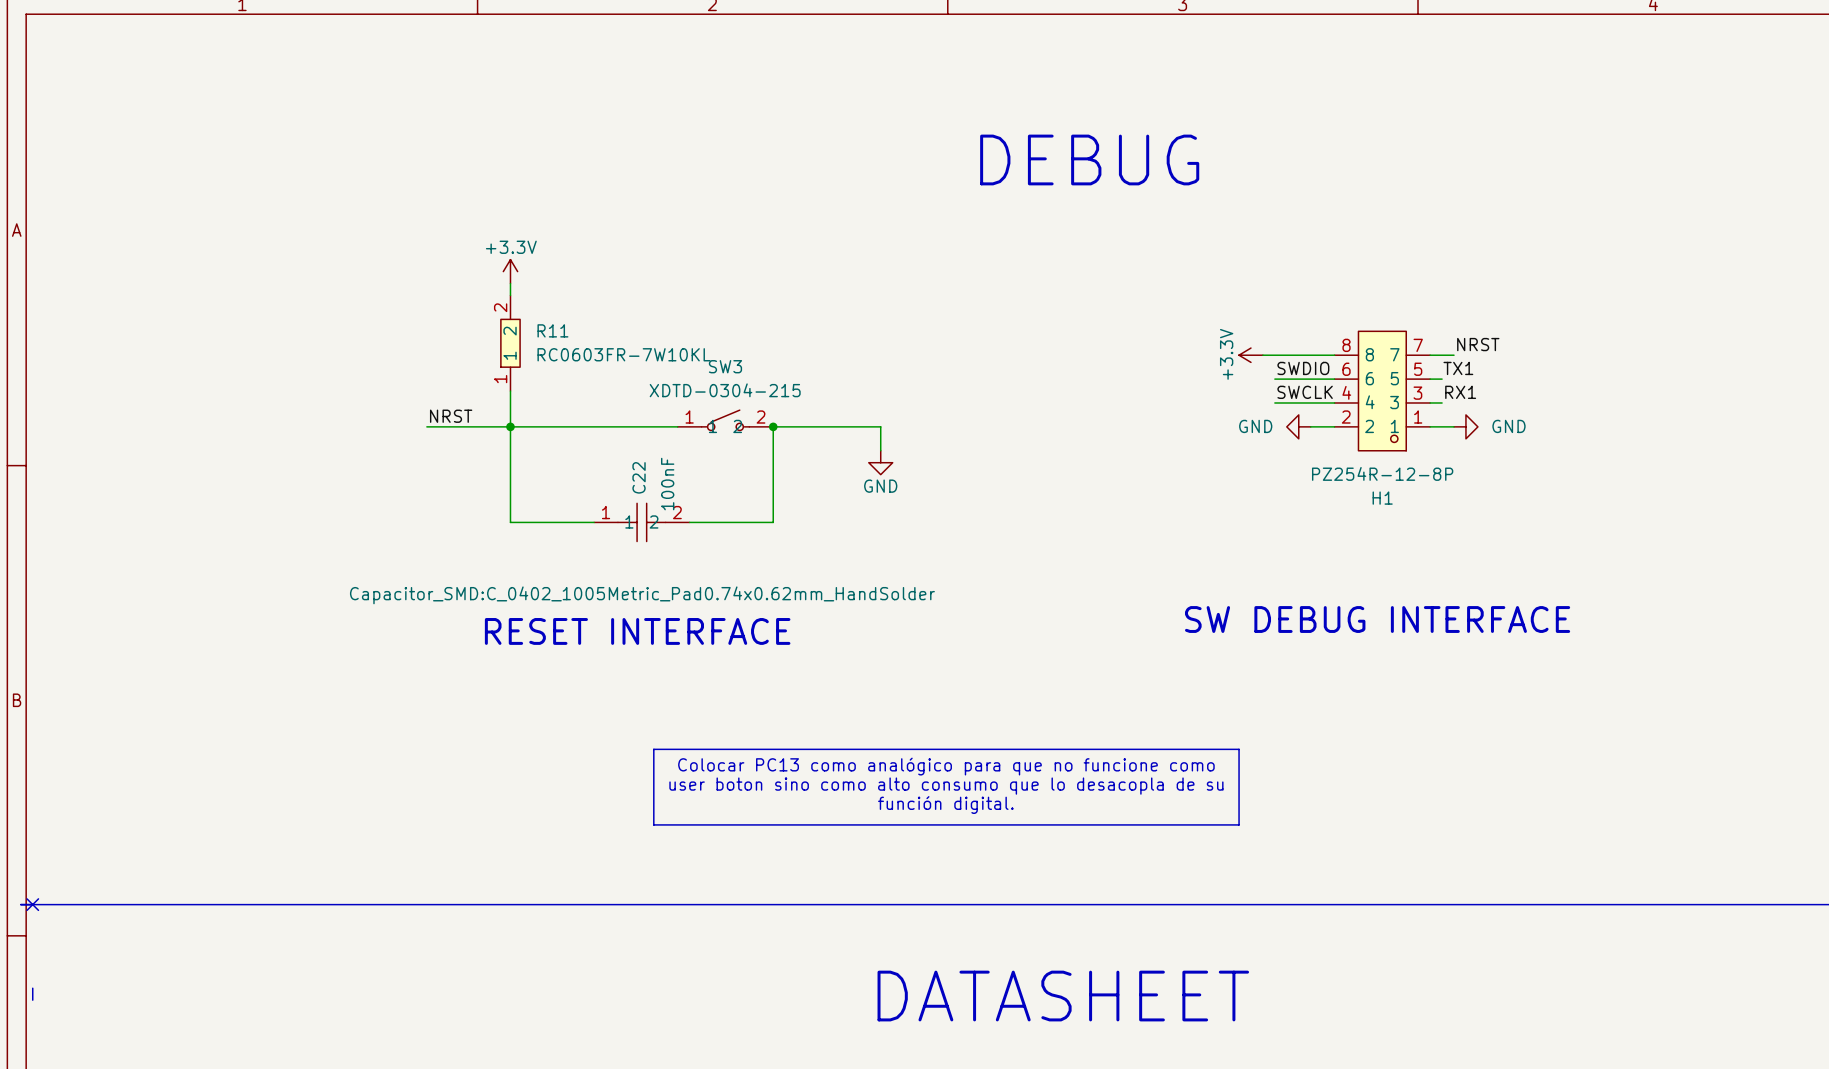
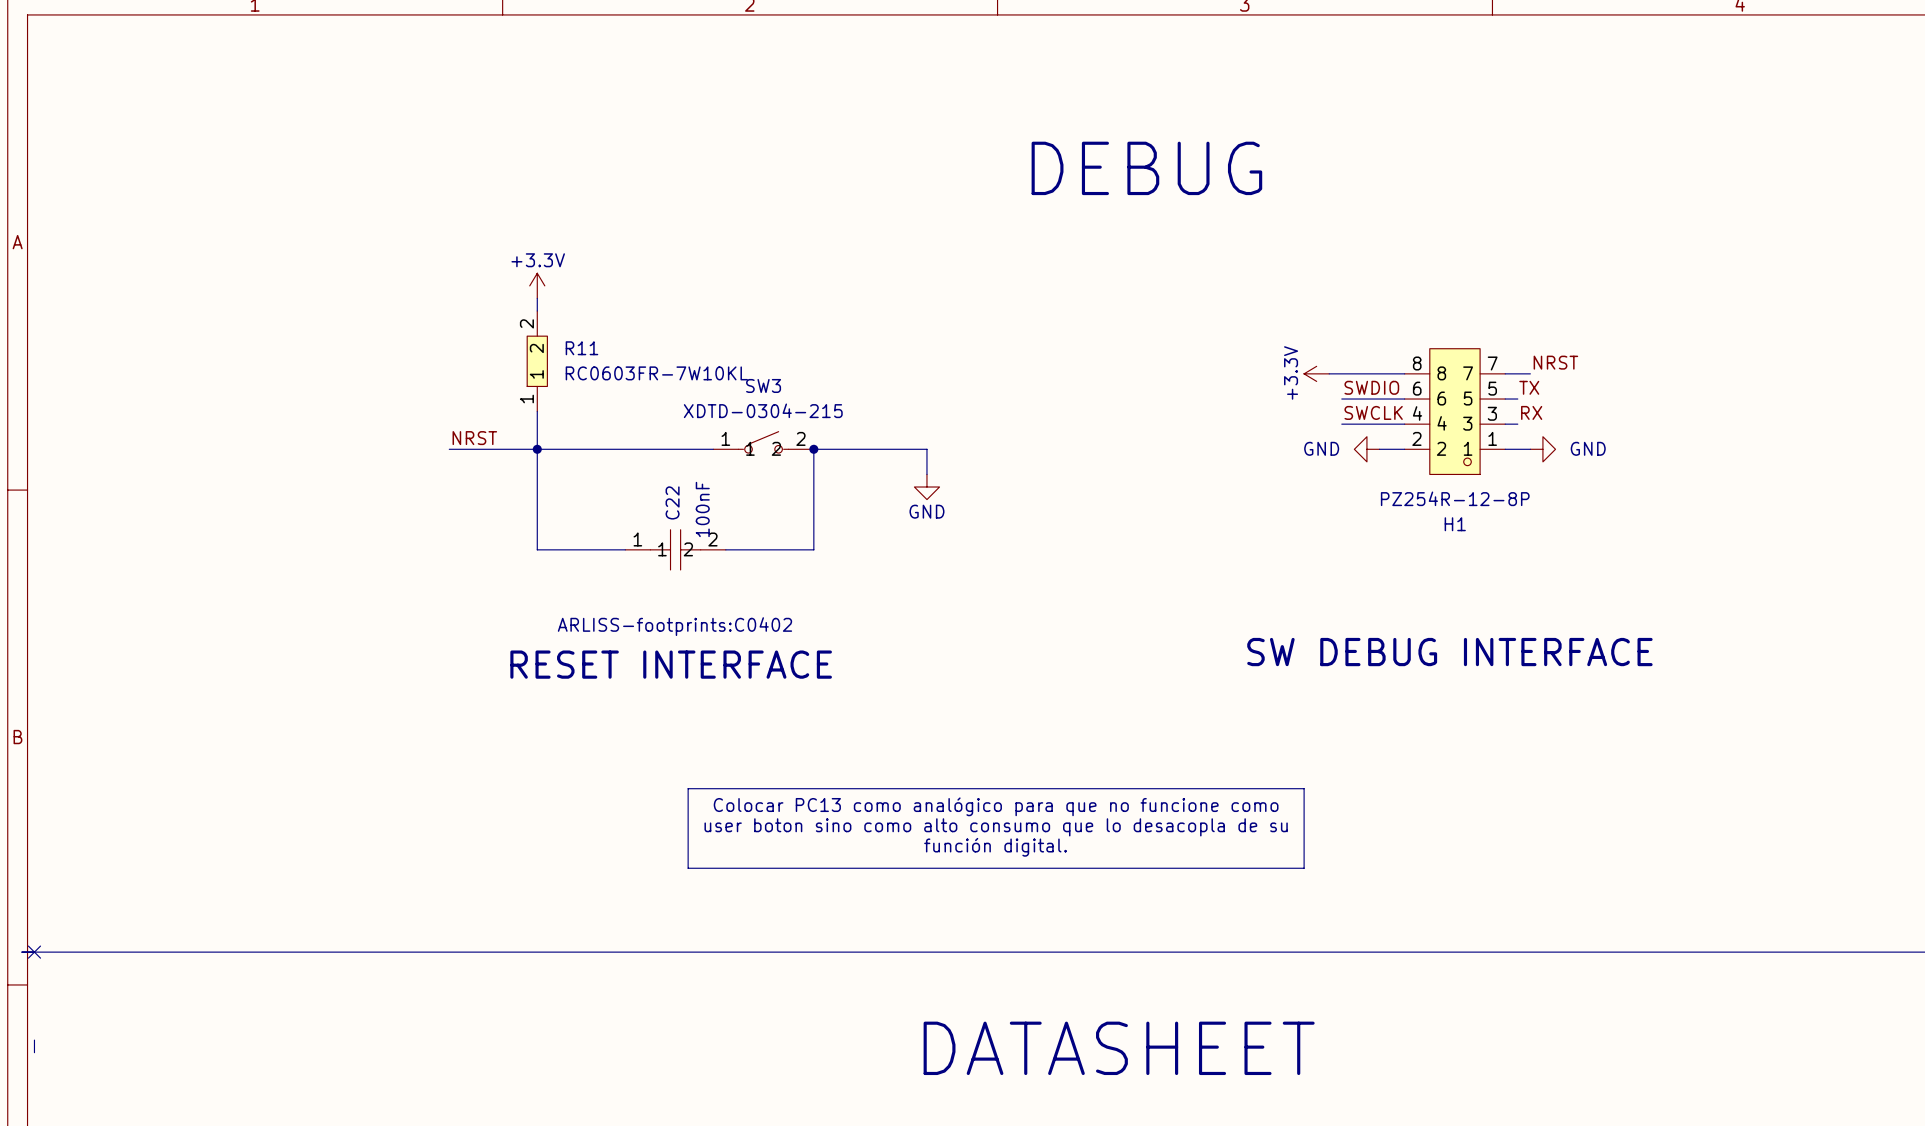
label: TX1 (1458, 368) -> TX (1529, 387)
label: RX1 (1460, 392) -> RX (1531, 412)
C22 text: Capacitor_SMD:C_0402_1005Metric_Pad0.74x0.62mm_HandSolder (642, 595) -> ARLISS-footprints:C0402 (674, 626)

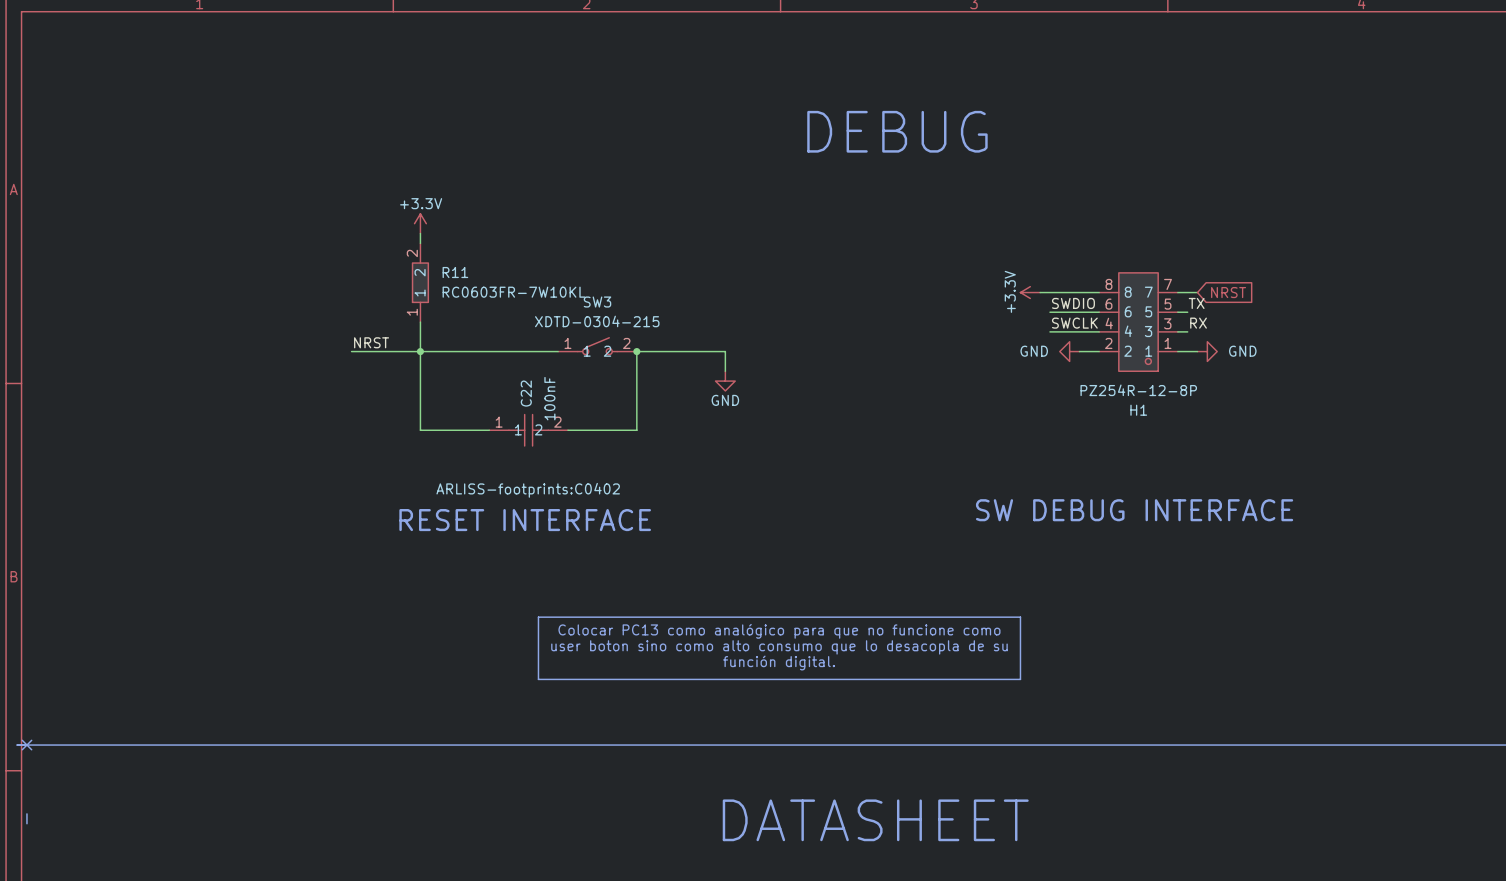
label: NRST (1555, 362) -> none
global label: none -> NRST (1228, 292)

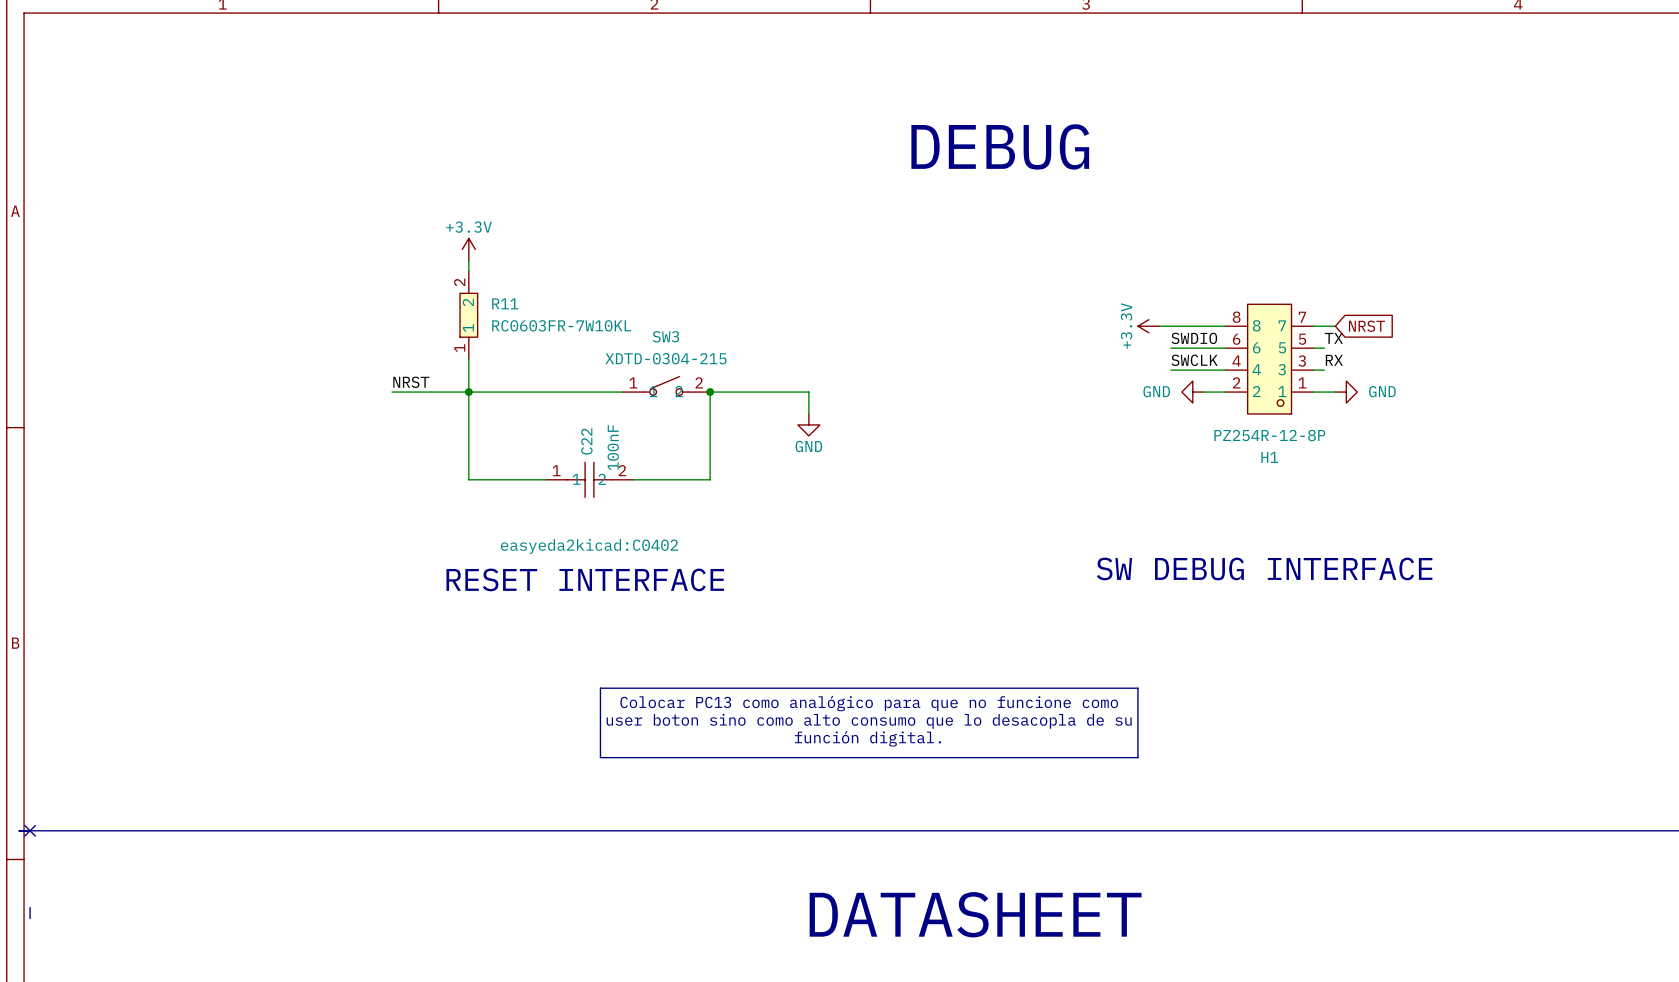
C22 text: ARLISS-footprints:C0402 (528, 490) -> easyeda2kicad:C0402 (589, 546)

